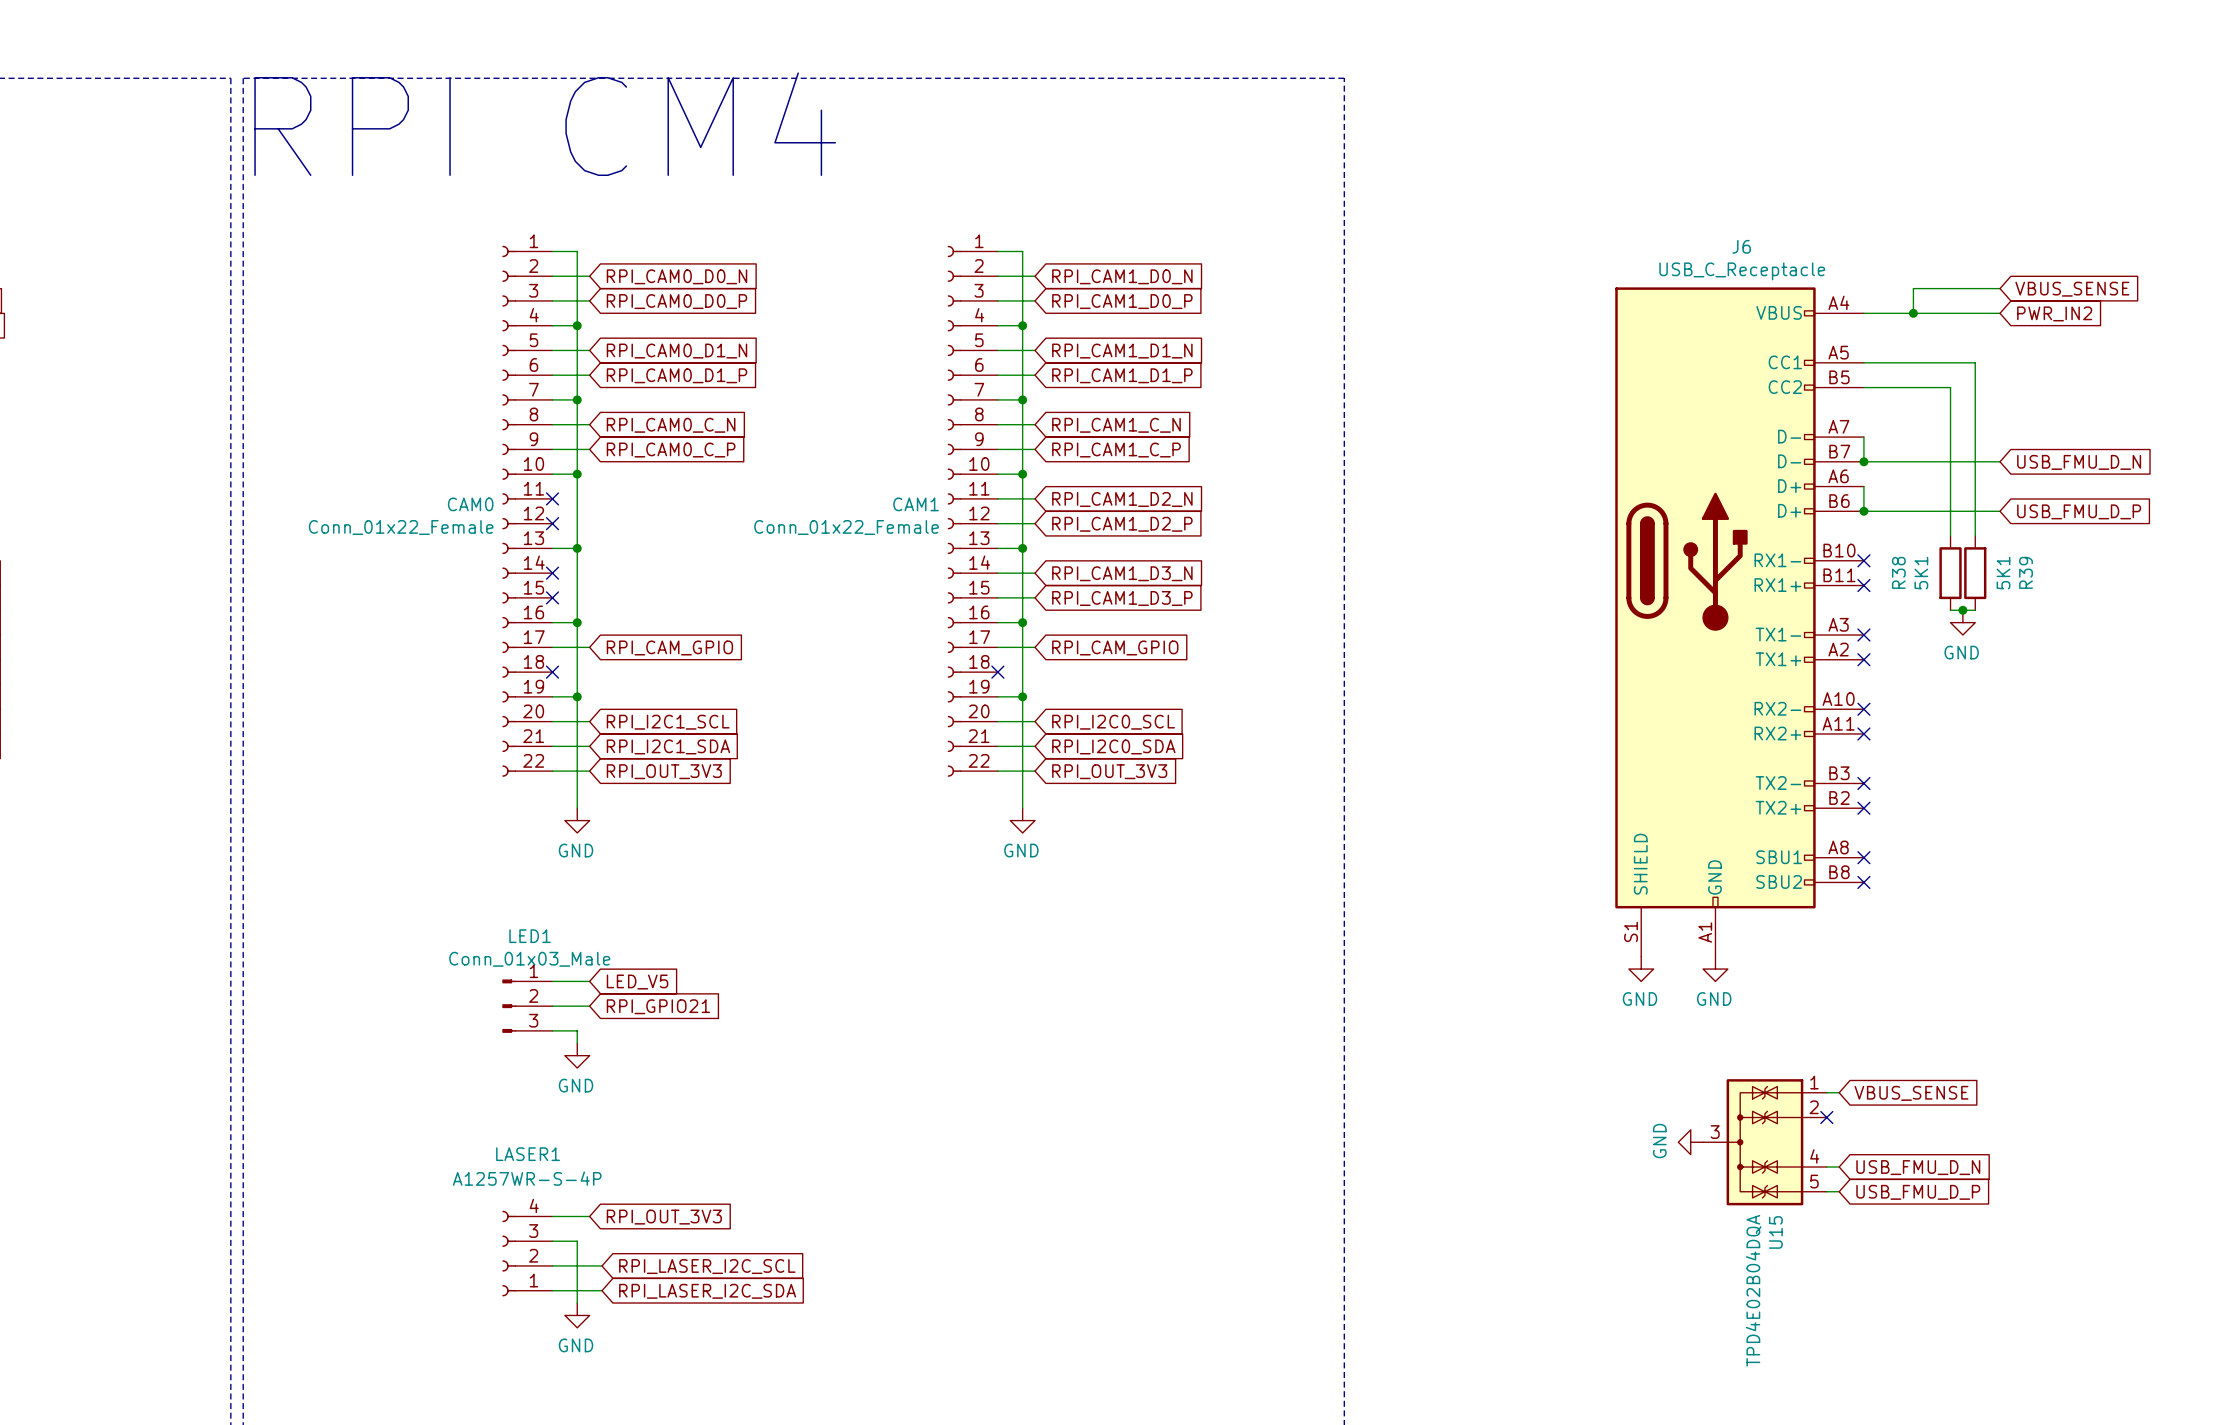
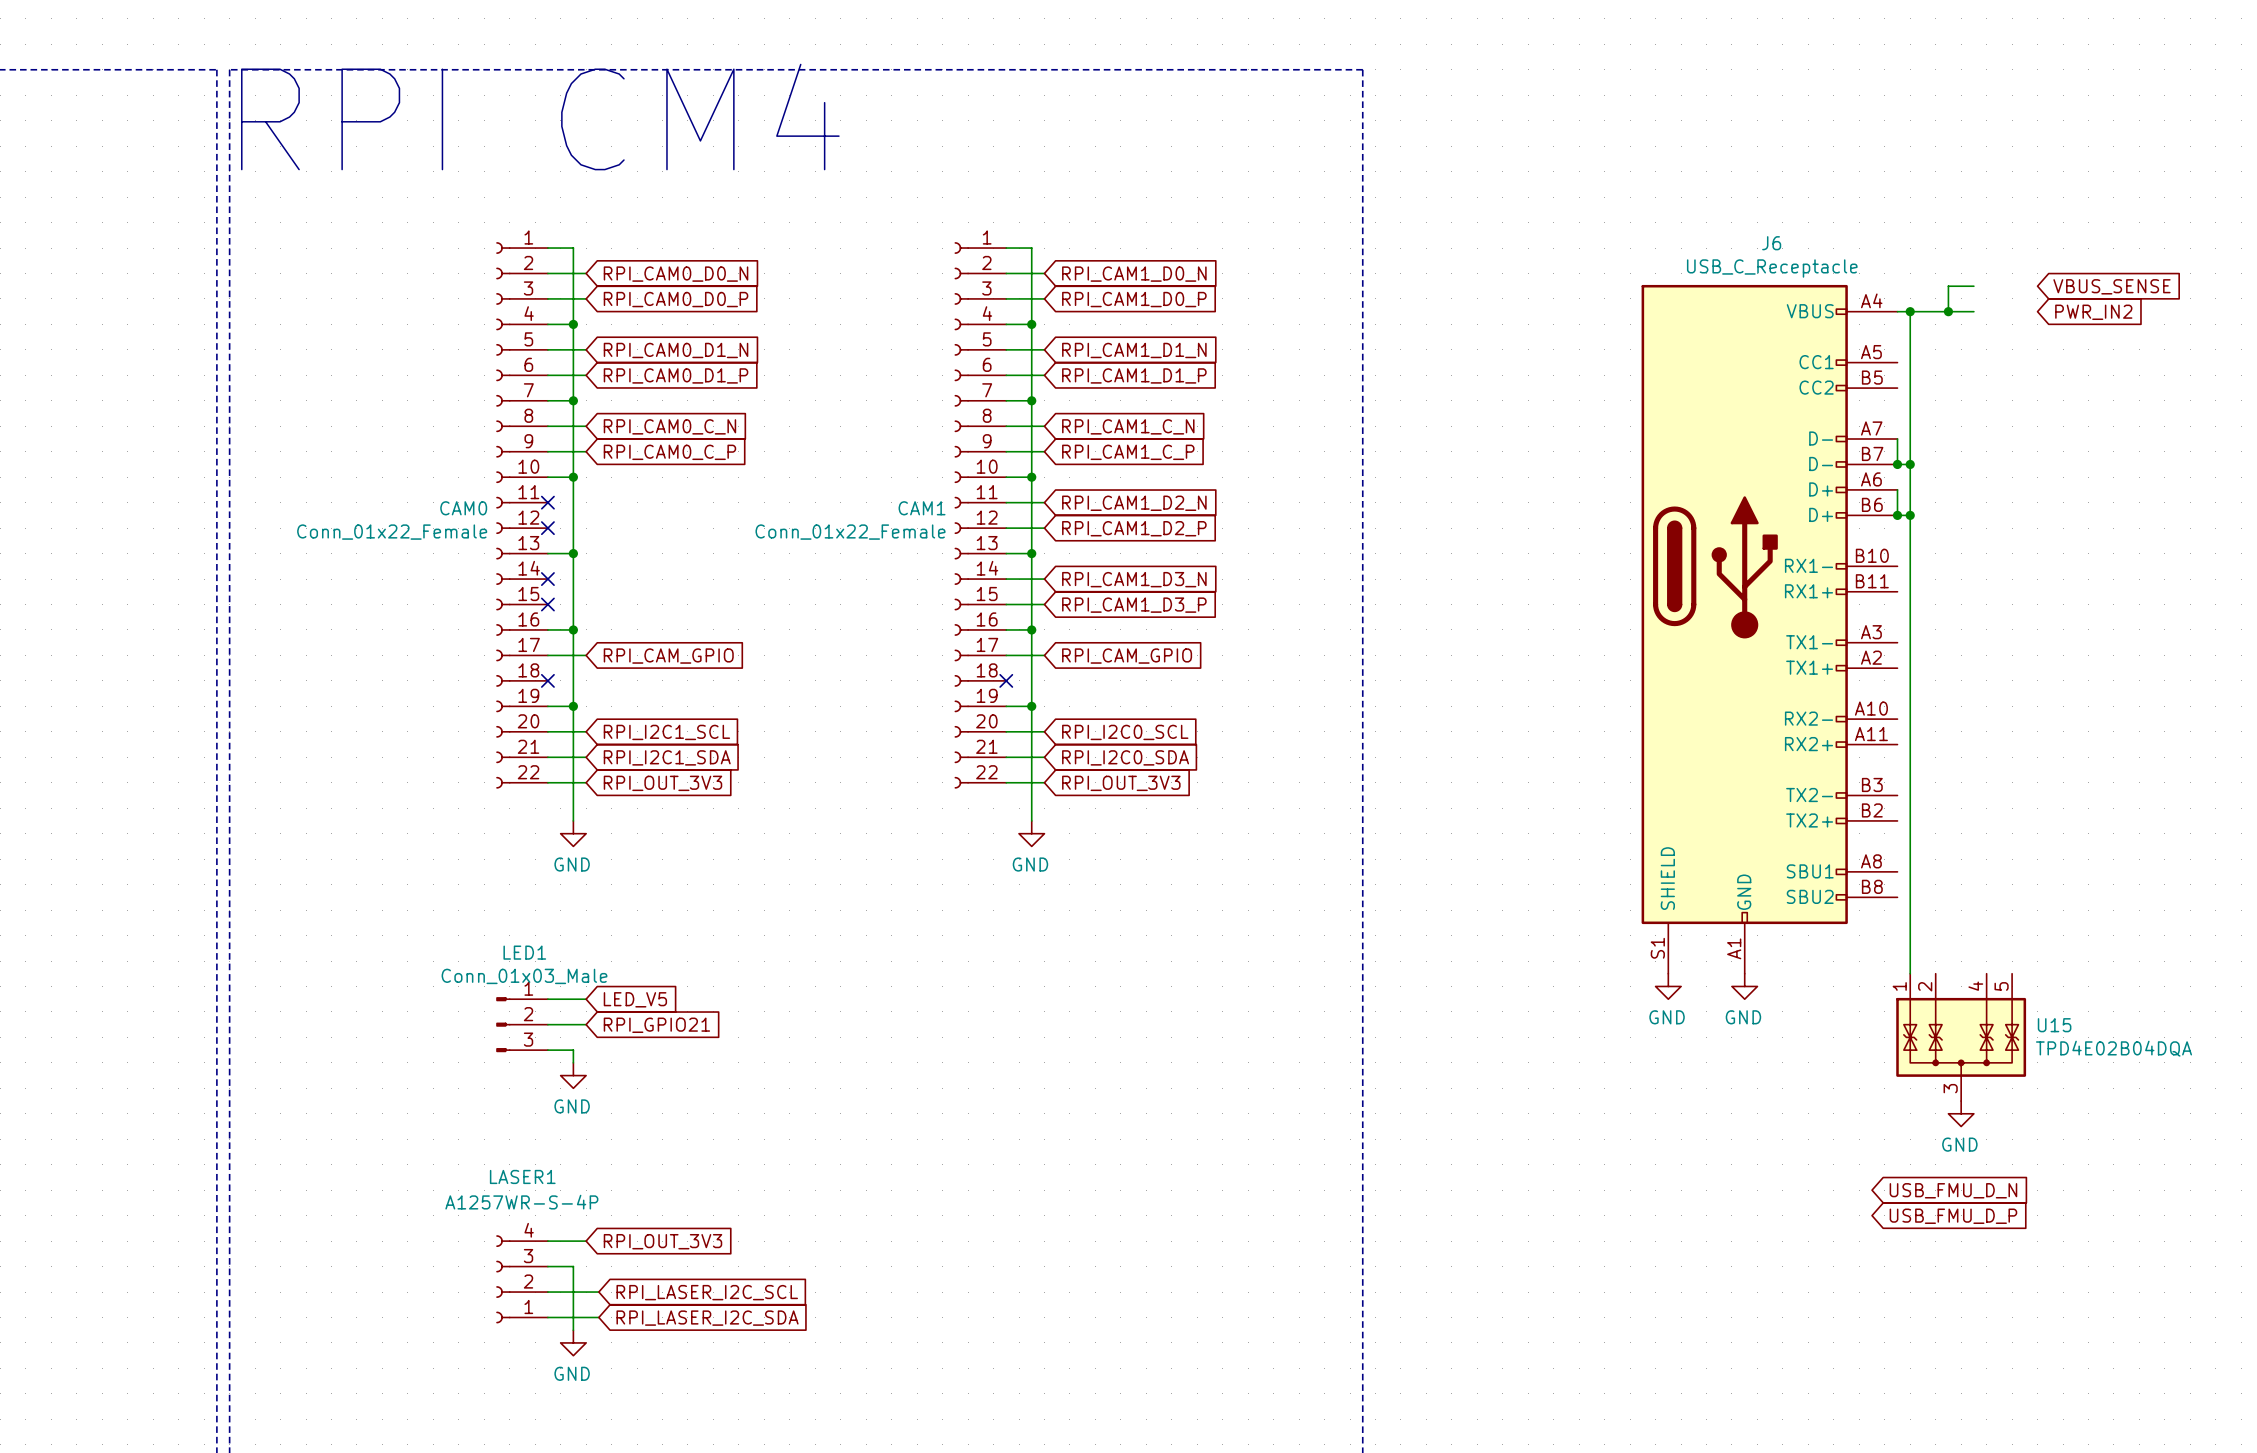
wire: (1938, 288) (2000, 288) -> none
wire: none -> (1910, 311) (1910, 973)
junction: none -> (1910, 311)
wire: (1938, 313) (2000, 313) -> none
wire: (1863, 362) (1975, 362) (1975, 536) -> none
wire: (1863, 387) (1950, 387) (1950, 536) -> none
wire: (1876, 461) (2000, 461) -> none
junction: none -> (1910, 464)
global label: USB_FMU_D_N (2079, 462) -> none
wire: (1876, 511) (2000, 511) -> none
junction: none -> (1910, 515)
global label: USB_FMU_D_P (2079, 511) -> none
no-connect mark: (1863, 560) -> none
R38: 5K1 (1950, 573) -> none
R39: 5K1 (1975, 573) -> none
no-connect mark: (1863, 585) -> none
wire: (1950, 610) (1975, 610) -> none
junction: (1962, 610) -> none
power symbol: GND (1962, 622) -> none
no-connect mark: (1863, 635) -> none
no-connect mark: (1863, 659) -> none
no-connect mark: (1863, 709) -> none
no-connect mark: (1863, 733) -> none
no-connect mark: (1863, 783) -> none
no-connect mark: (1863, 808) -> none
no-connect mark: (1863, 857) -> none
no-connect mark: (1863, 882) -> none
wire: (1826, 1092) (1839, 1092) -> none
power symbol: none -> GND (1961, 1113)
global label: VBUS_SENSE (1911, 1093) -> none
no-connect mark: (1826, 1117) -> none
power symbol: GND (1690, 1142) -> none
U15 rotation: 0° (1764, 1142) -> 90° counterclockwise (1961, 1037)
U15 position: (1764, 1142) -> (1961, 1037)
wire: (1826, 1166) (1839, 1166) -> none
wire: (1826, 1191) (1839, 1191) -> none

